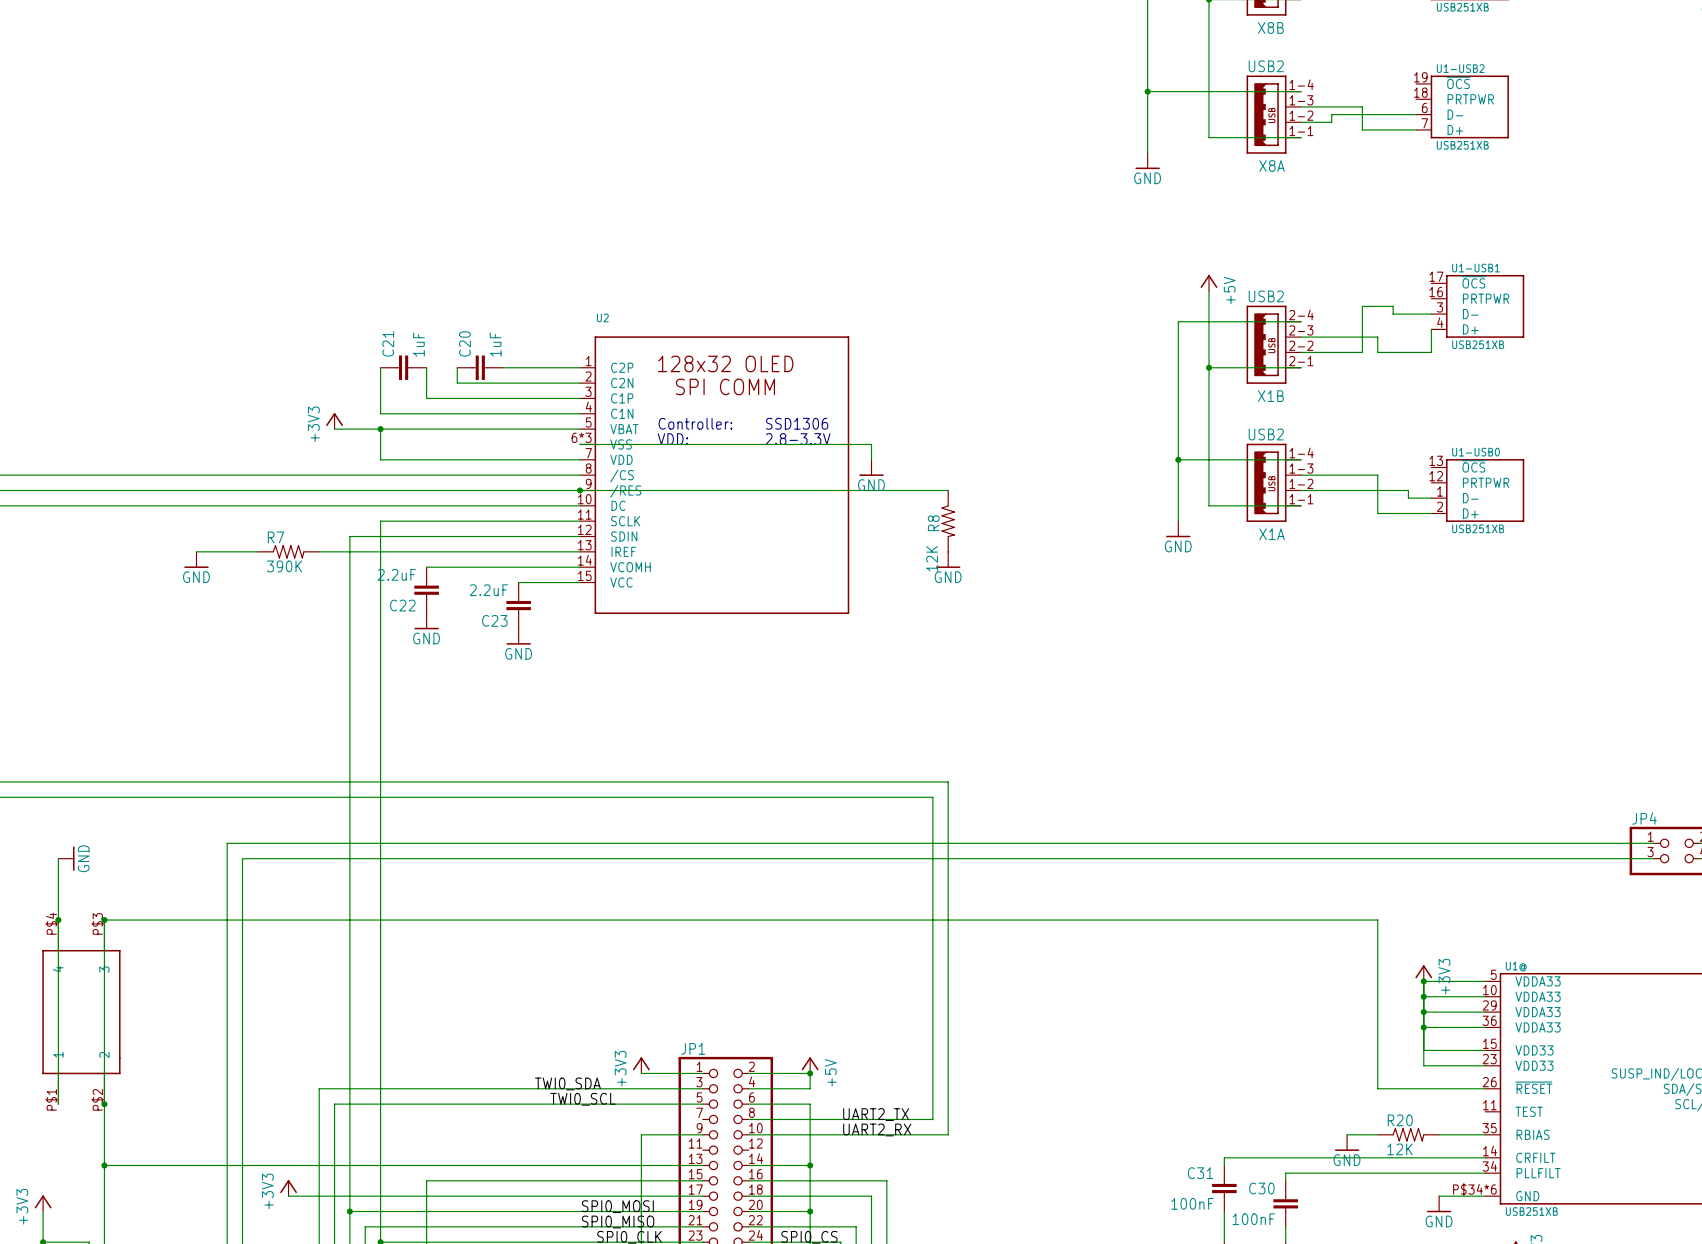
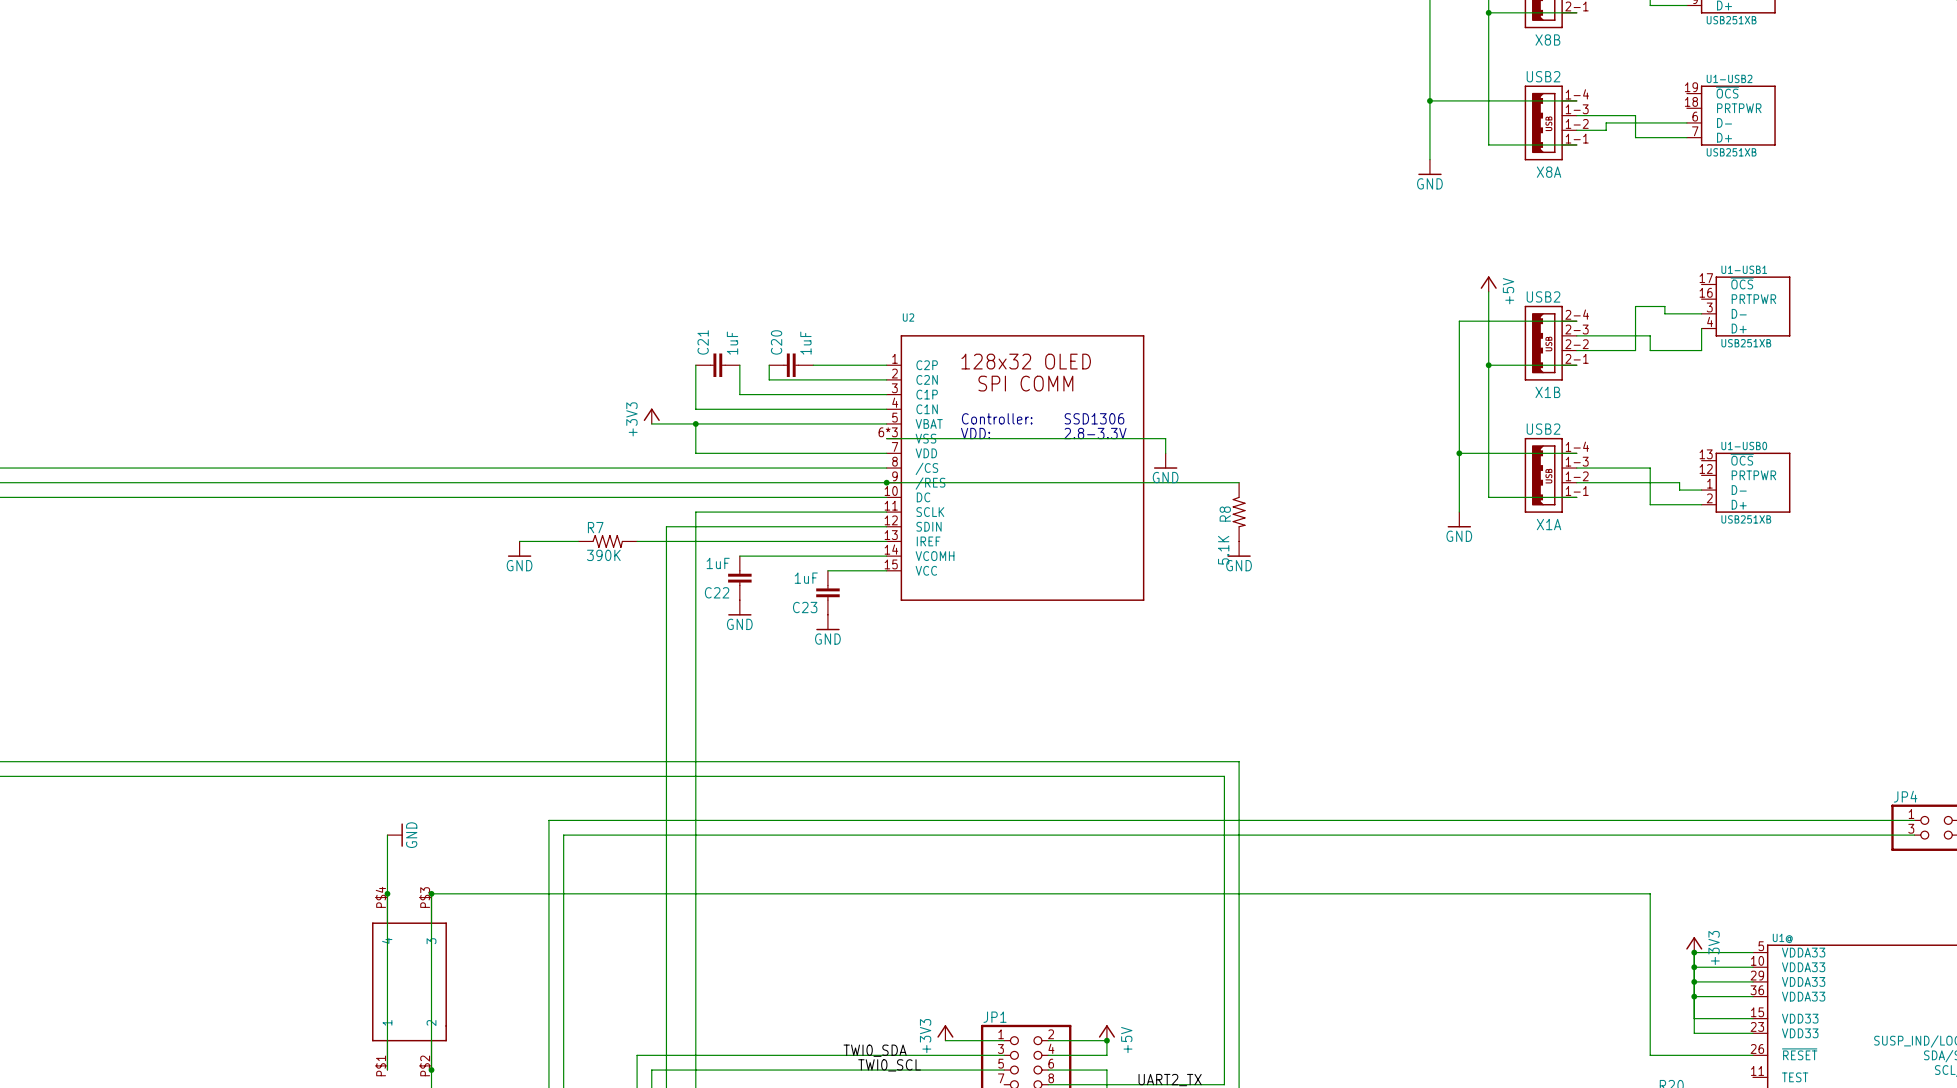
R8 value: 12K (932, 558) -> 5.1K (1223, 550)
C22 value: 2.2uF (396, 574) -> 1uF (718, 563)
C23 value: 2.2uF (488, 590) -> 1uF (806, 578)

